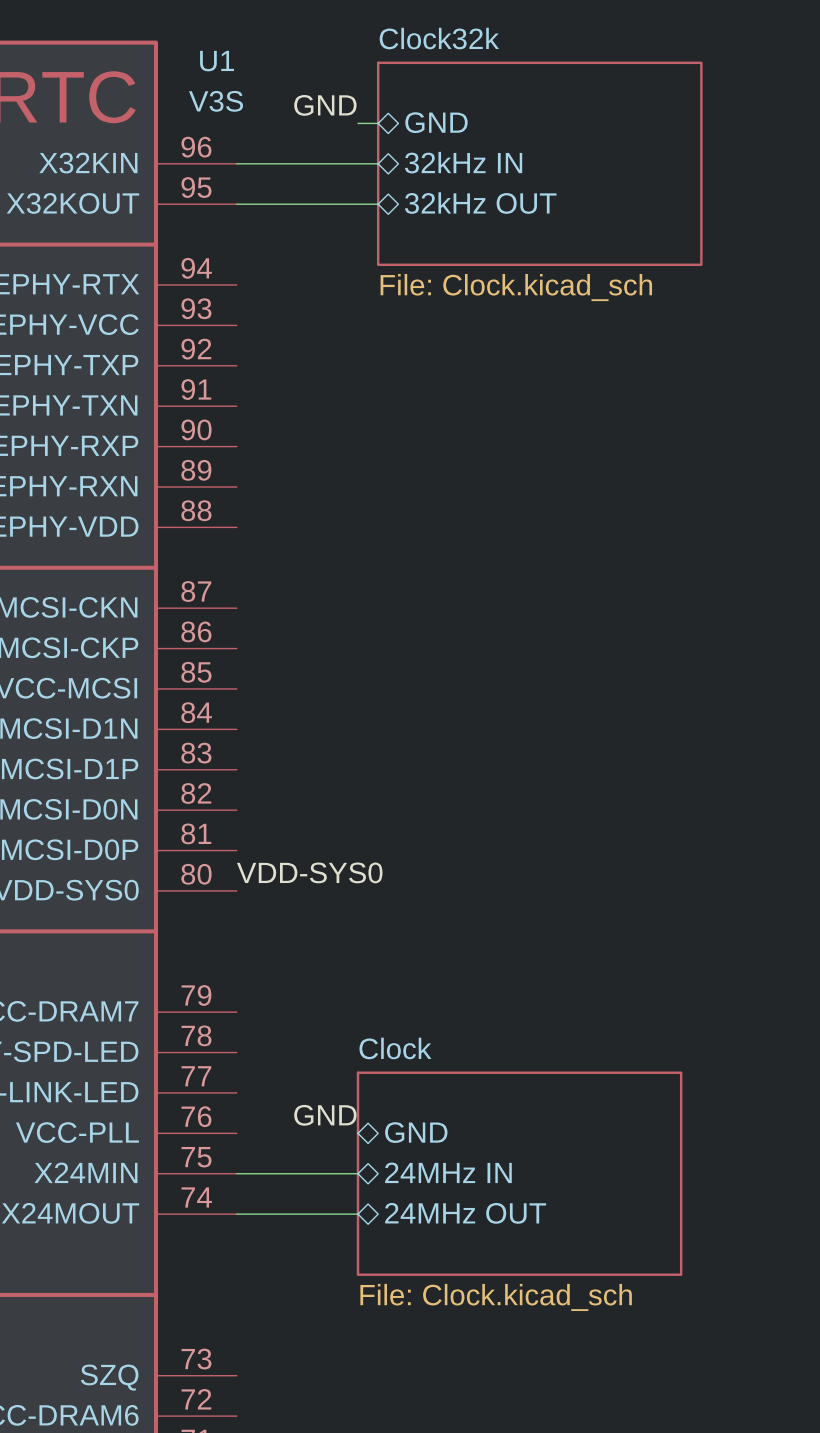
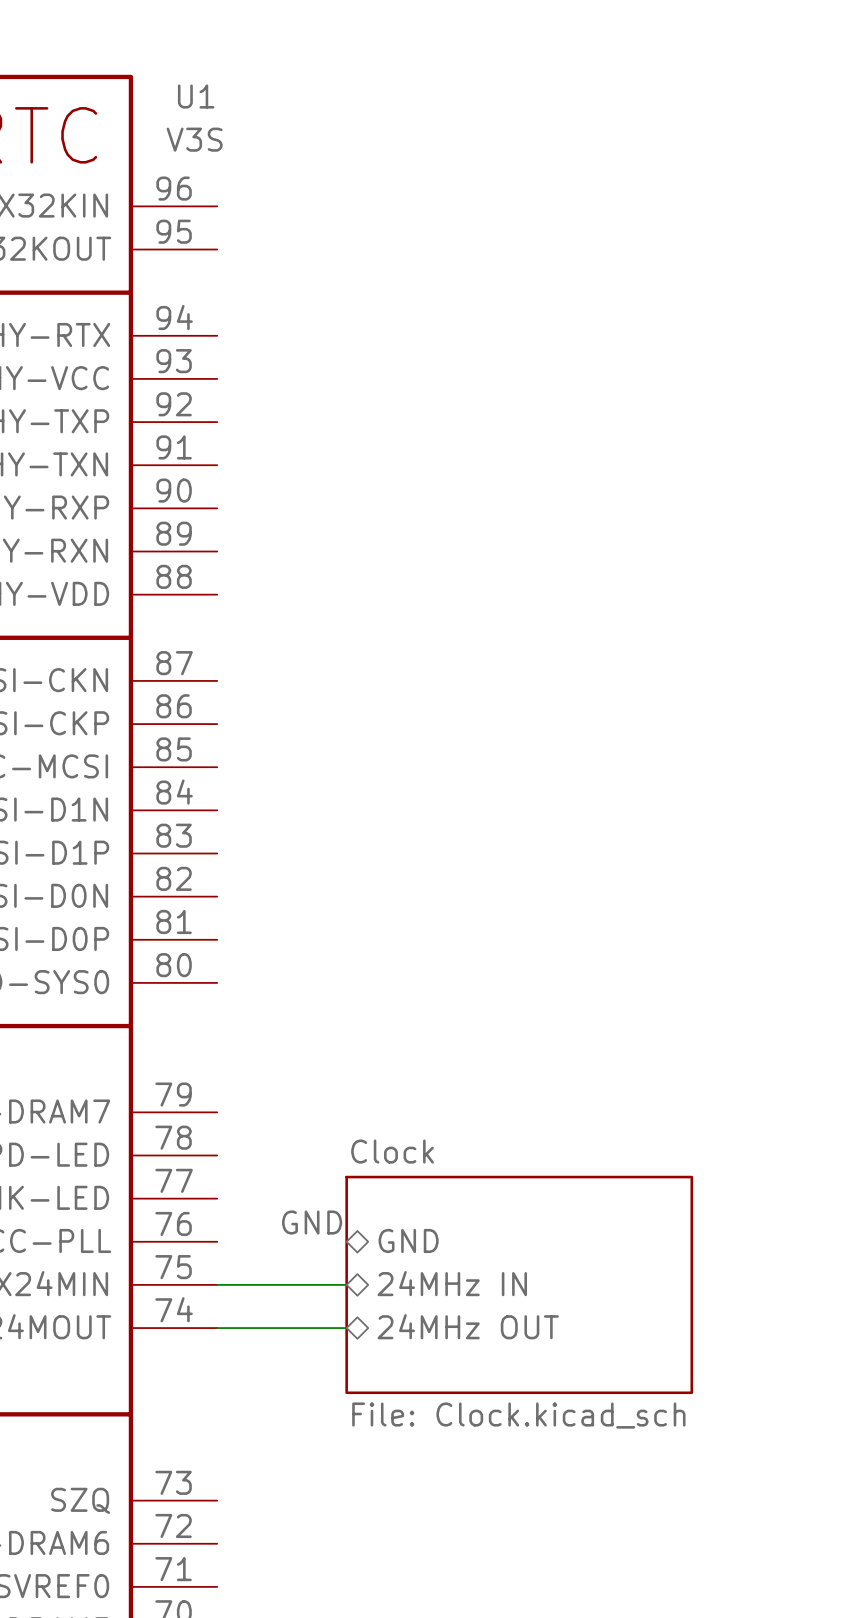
label: GND (325, 105) -> none
sheet pin: GND (436, 122) -> none
wire: (357, 123) (378, 123) -> none
sheet pin: 32kHz IN (463, 162) -> none
wire: (236, 163) (378, 163) -> none
sheet Clock32k: File: Clock.kicad_sch (539, 163) -> none
sheet pin: 32kHz OUT (480, 203) -> none
wire: (236, 204) (378, 204) -> none
label: VDD-SYS0 (309, 872) -> none

